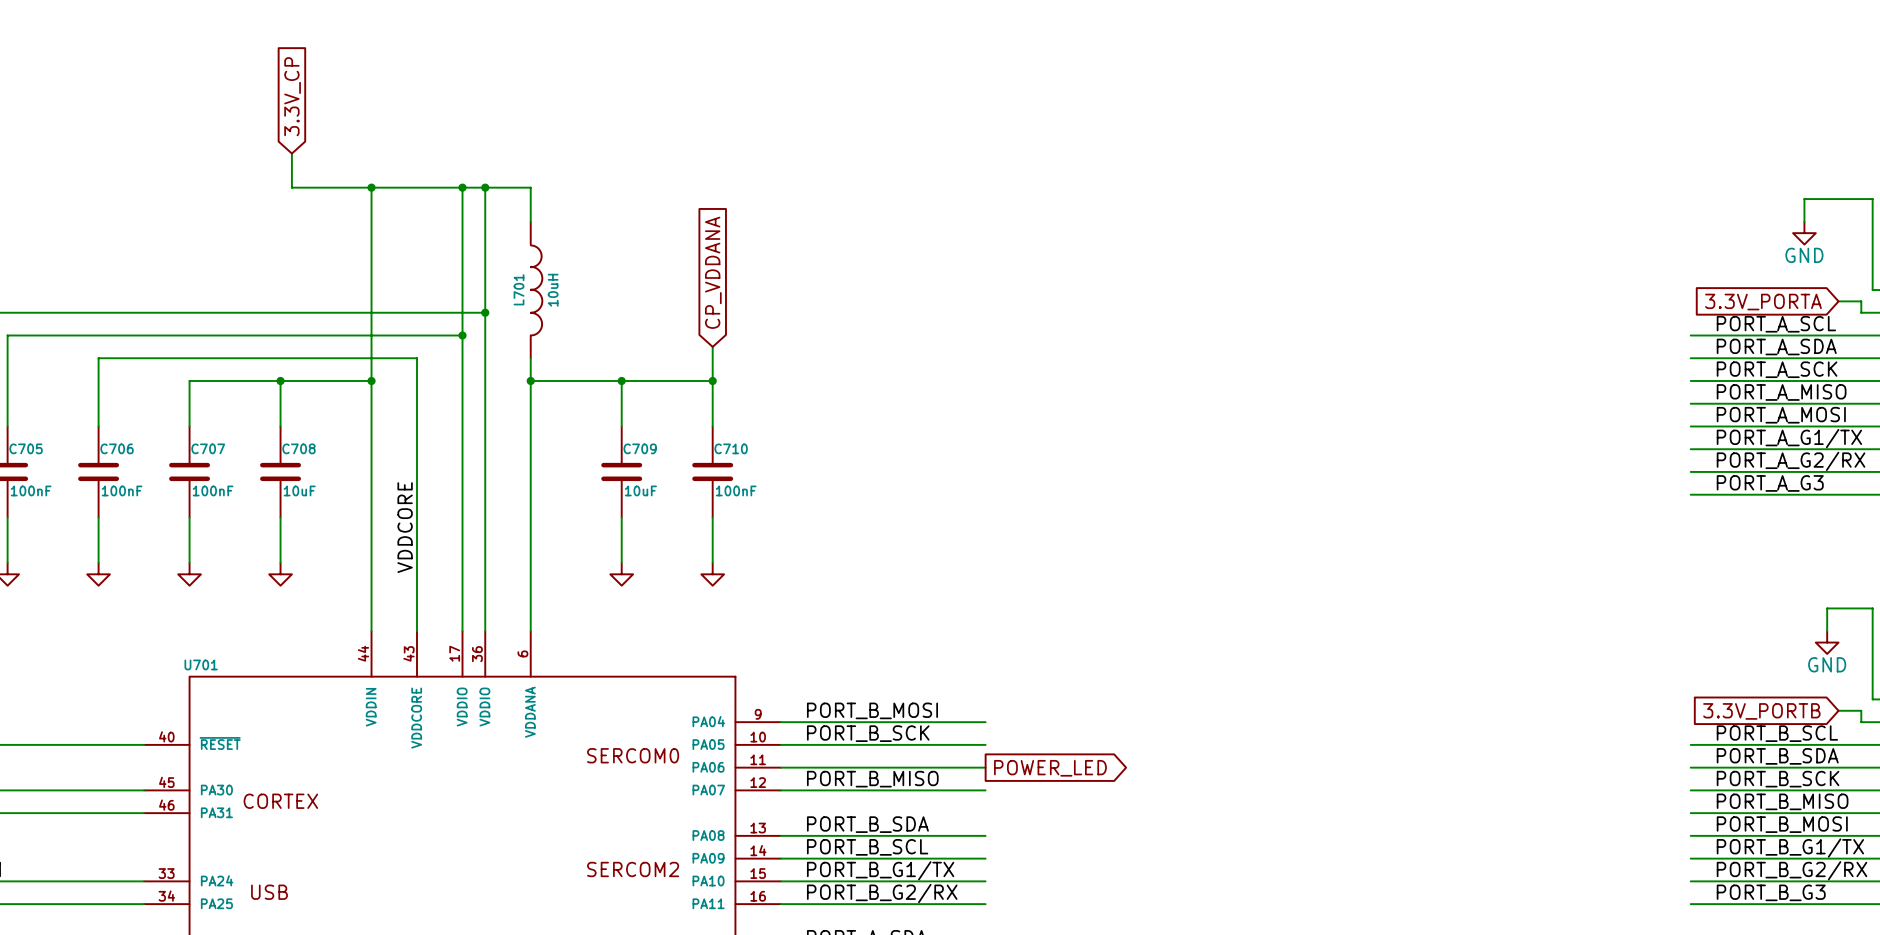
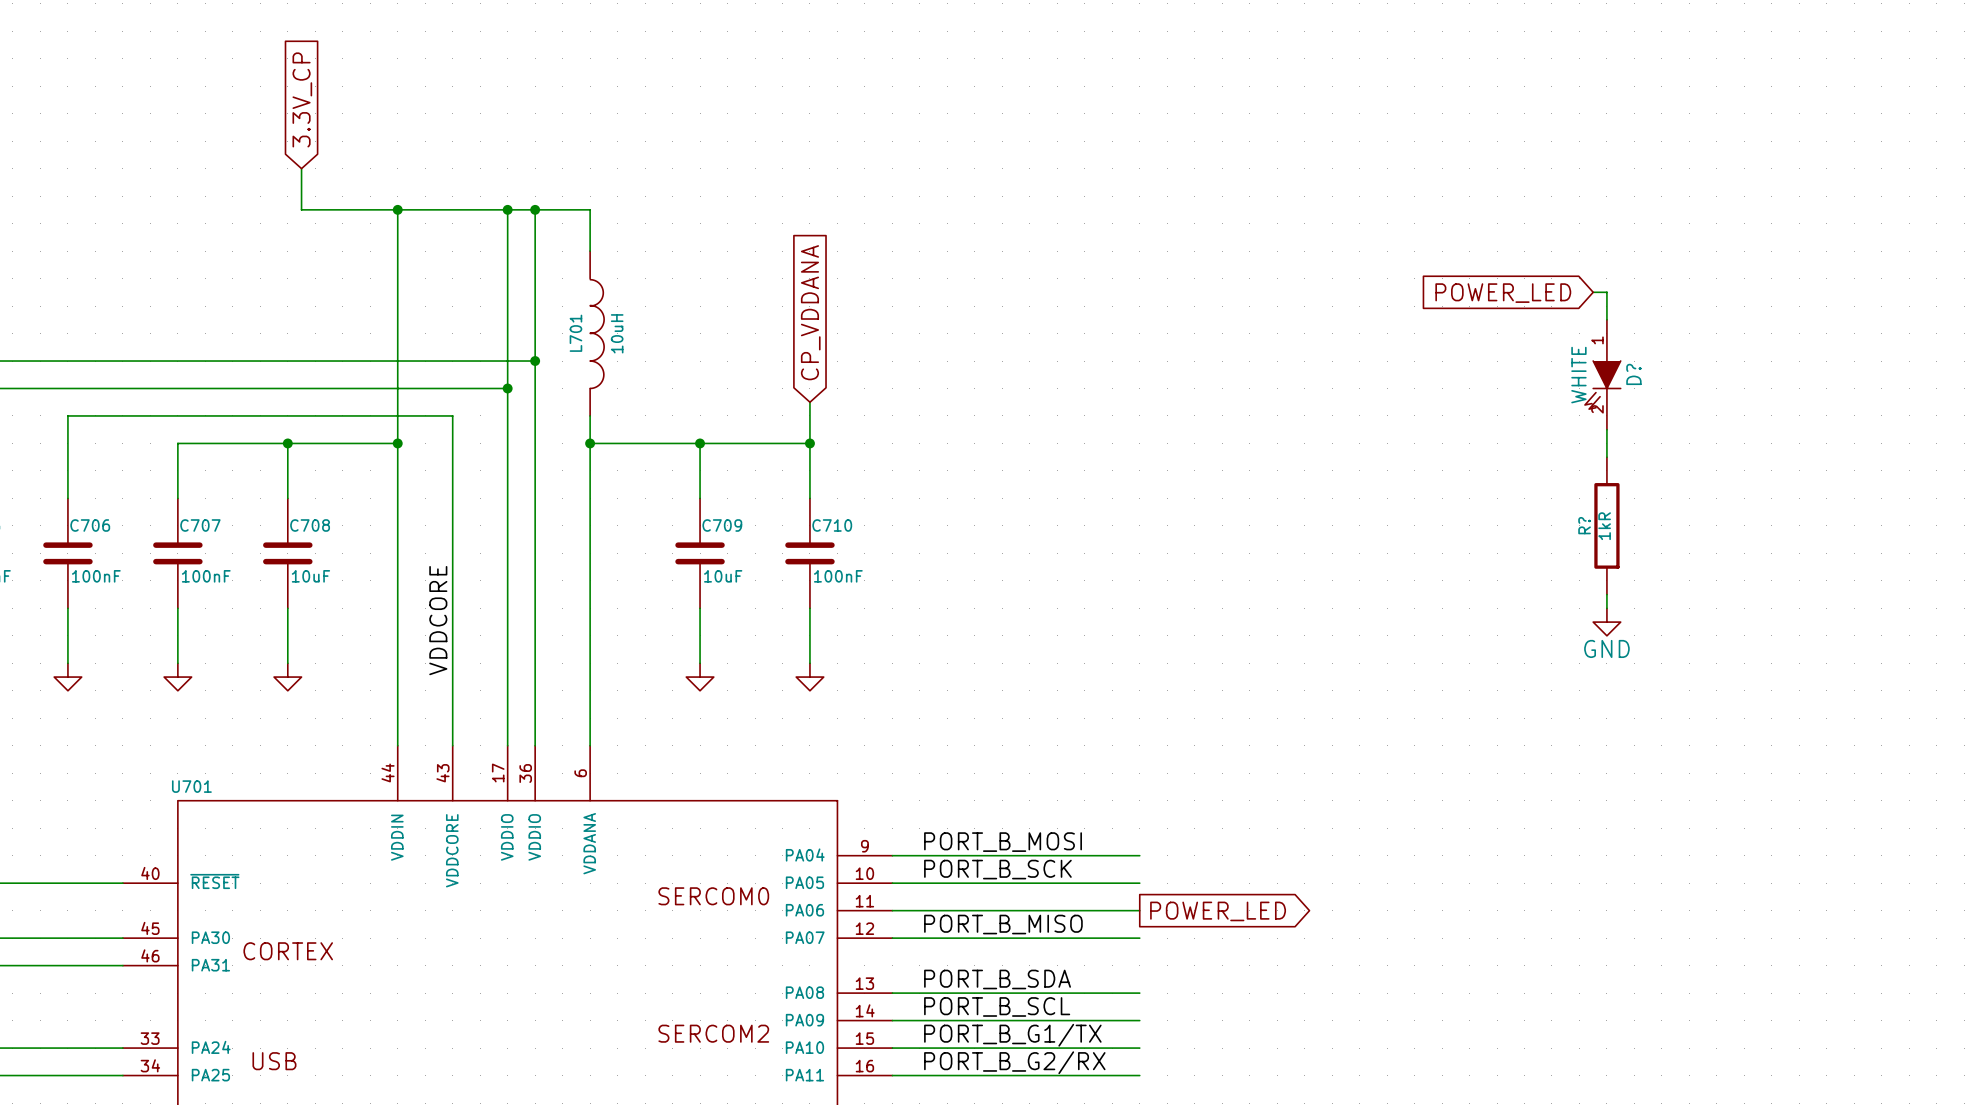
wire: none -> (1593, 292) (1606, 292) (1606, 319)
global label: none -> POWER_LED (1503, 293)
D?: none -> WHITE (1602, 374)
wire: none -> (1606, 429) (1606, 457)
R?: none -> 1kR (1606, 525)
wire: none -> (1606, 594) (1606, 608)
power symbol: none -> GND (1606, 622)

